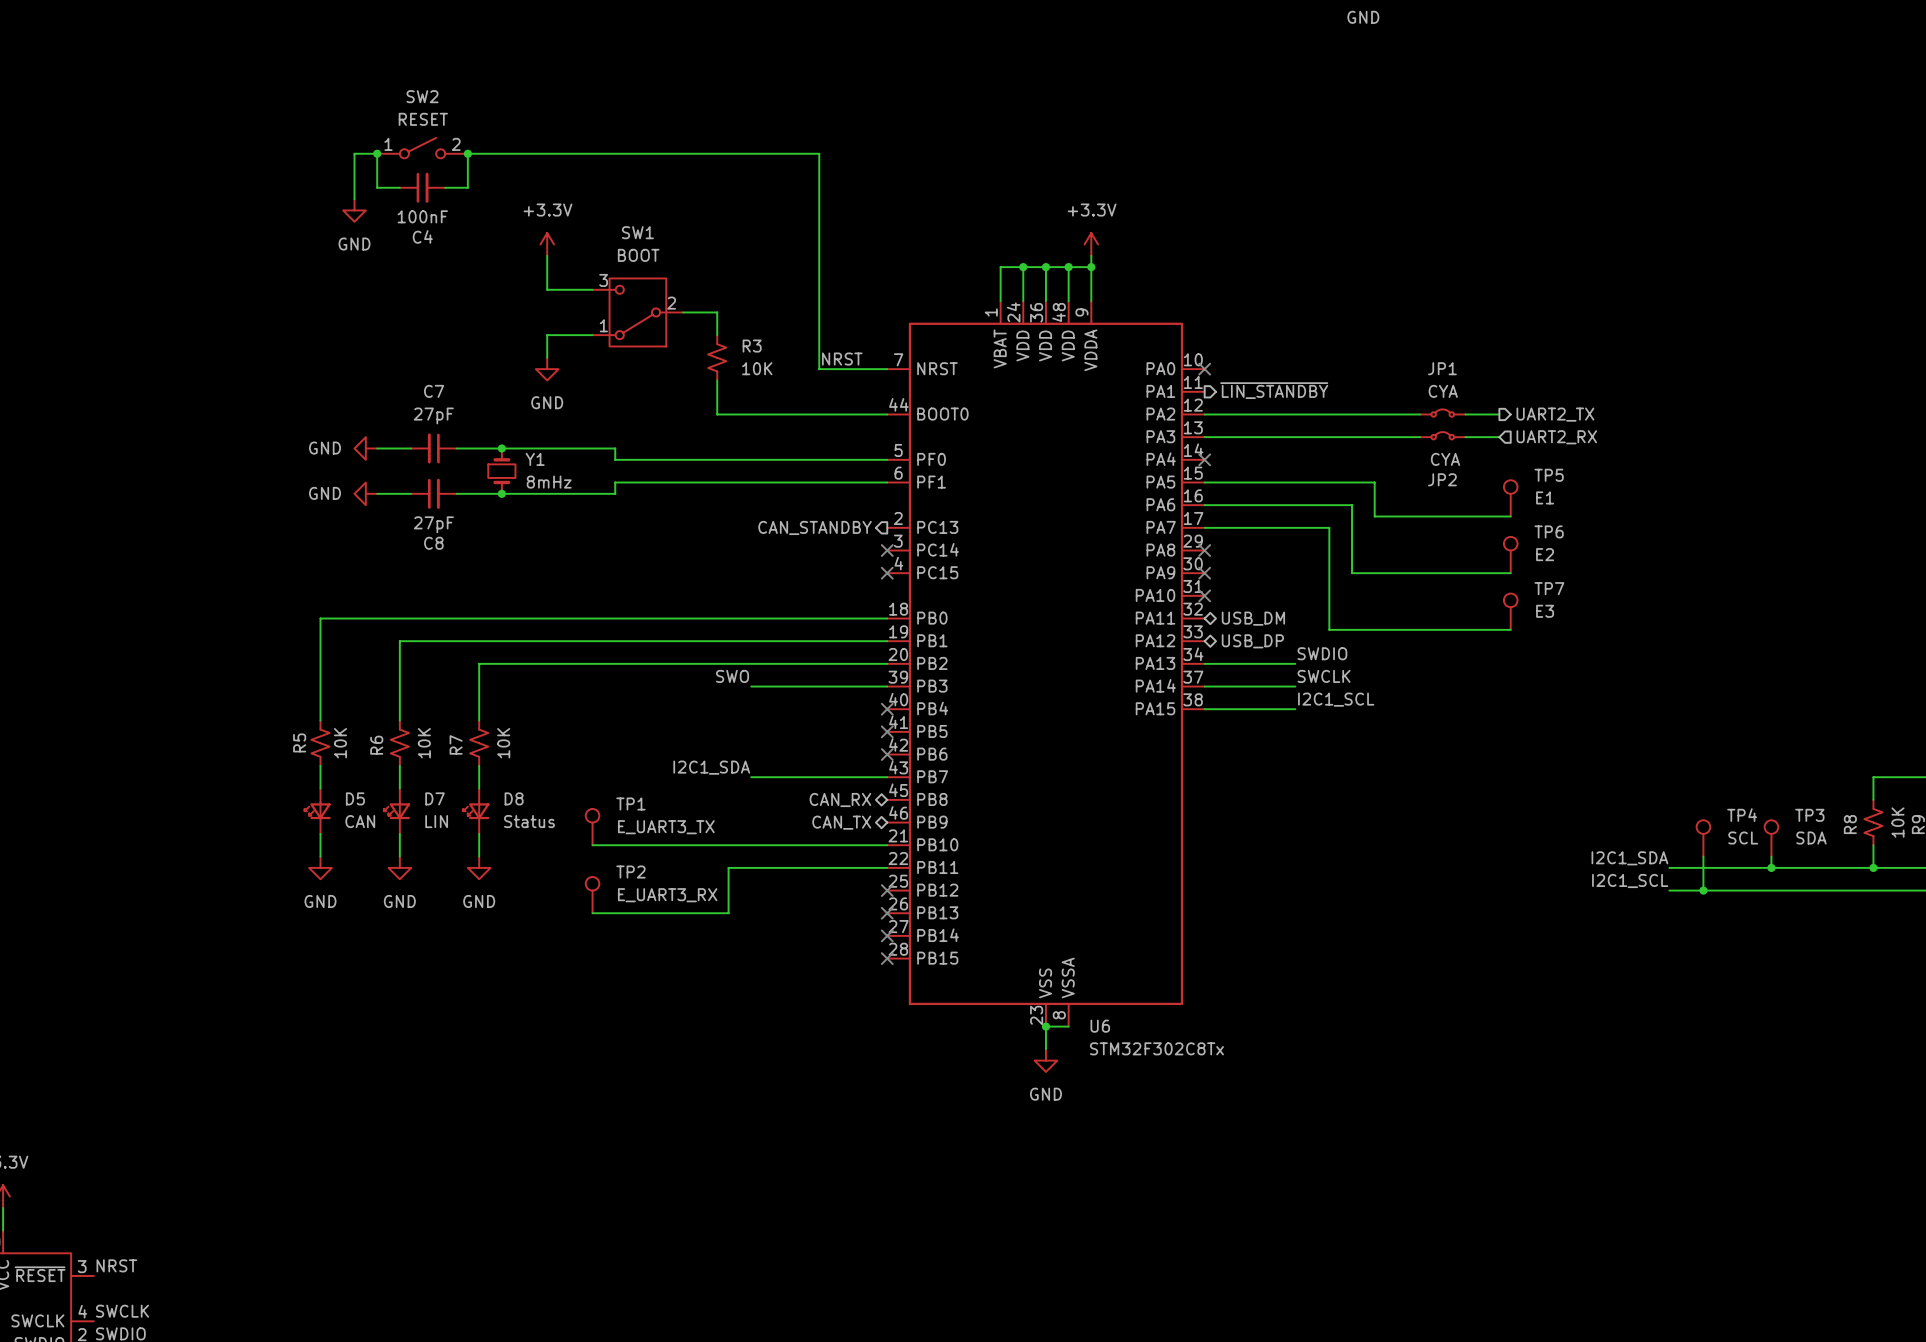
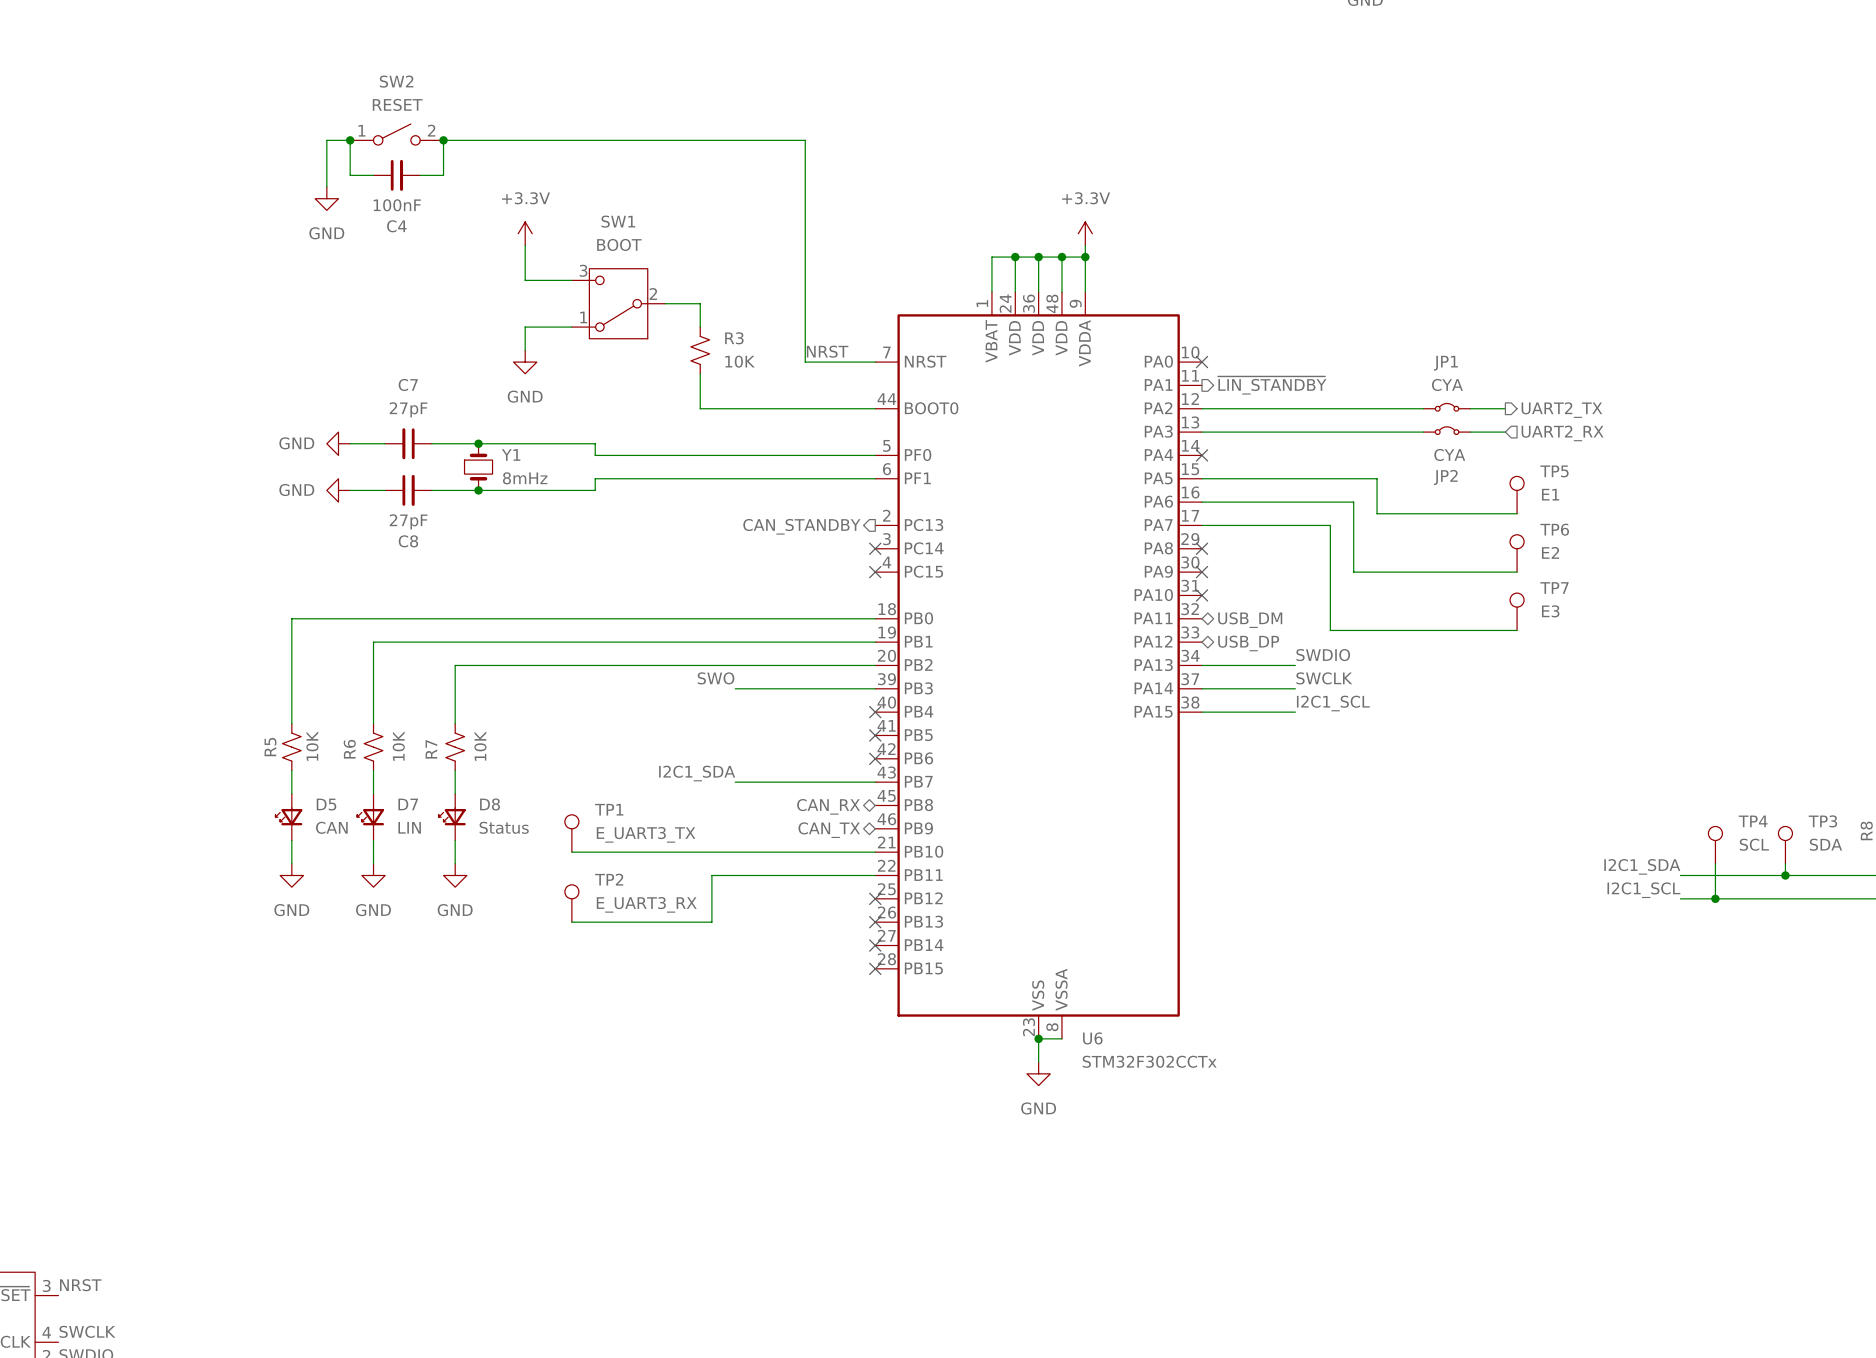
U6 value: STM32F302C8Tx (1156, 1048) -> STM32F302CCTx (1149, 1061)

